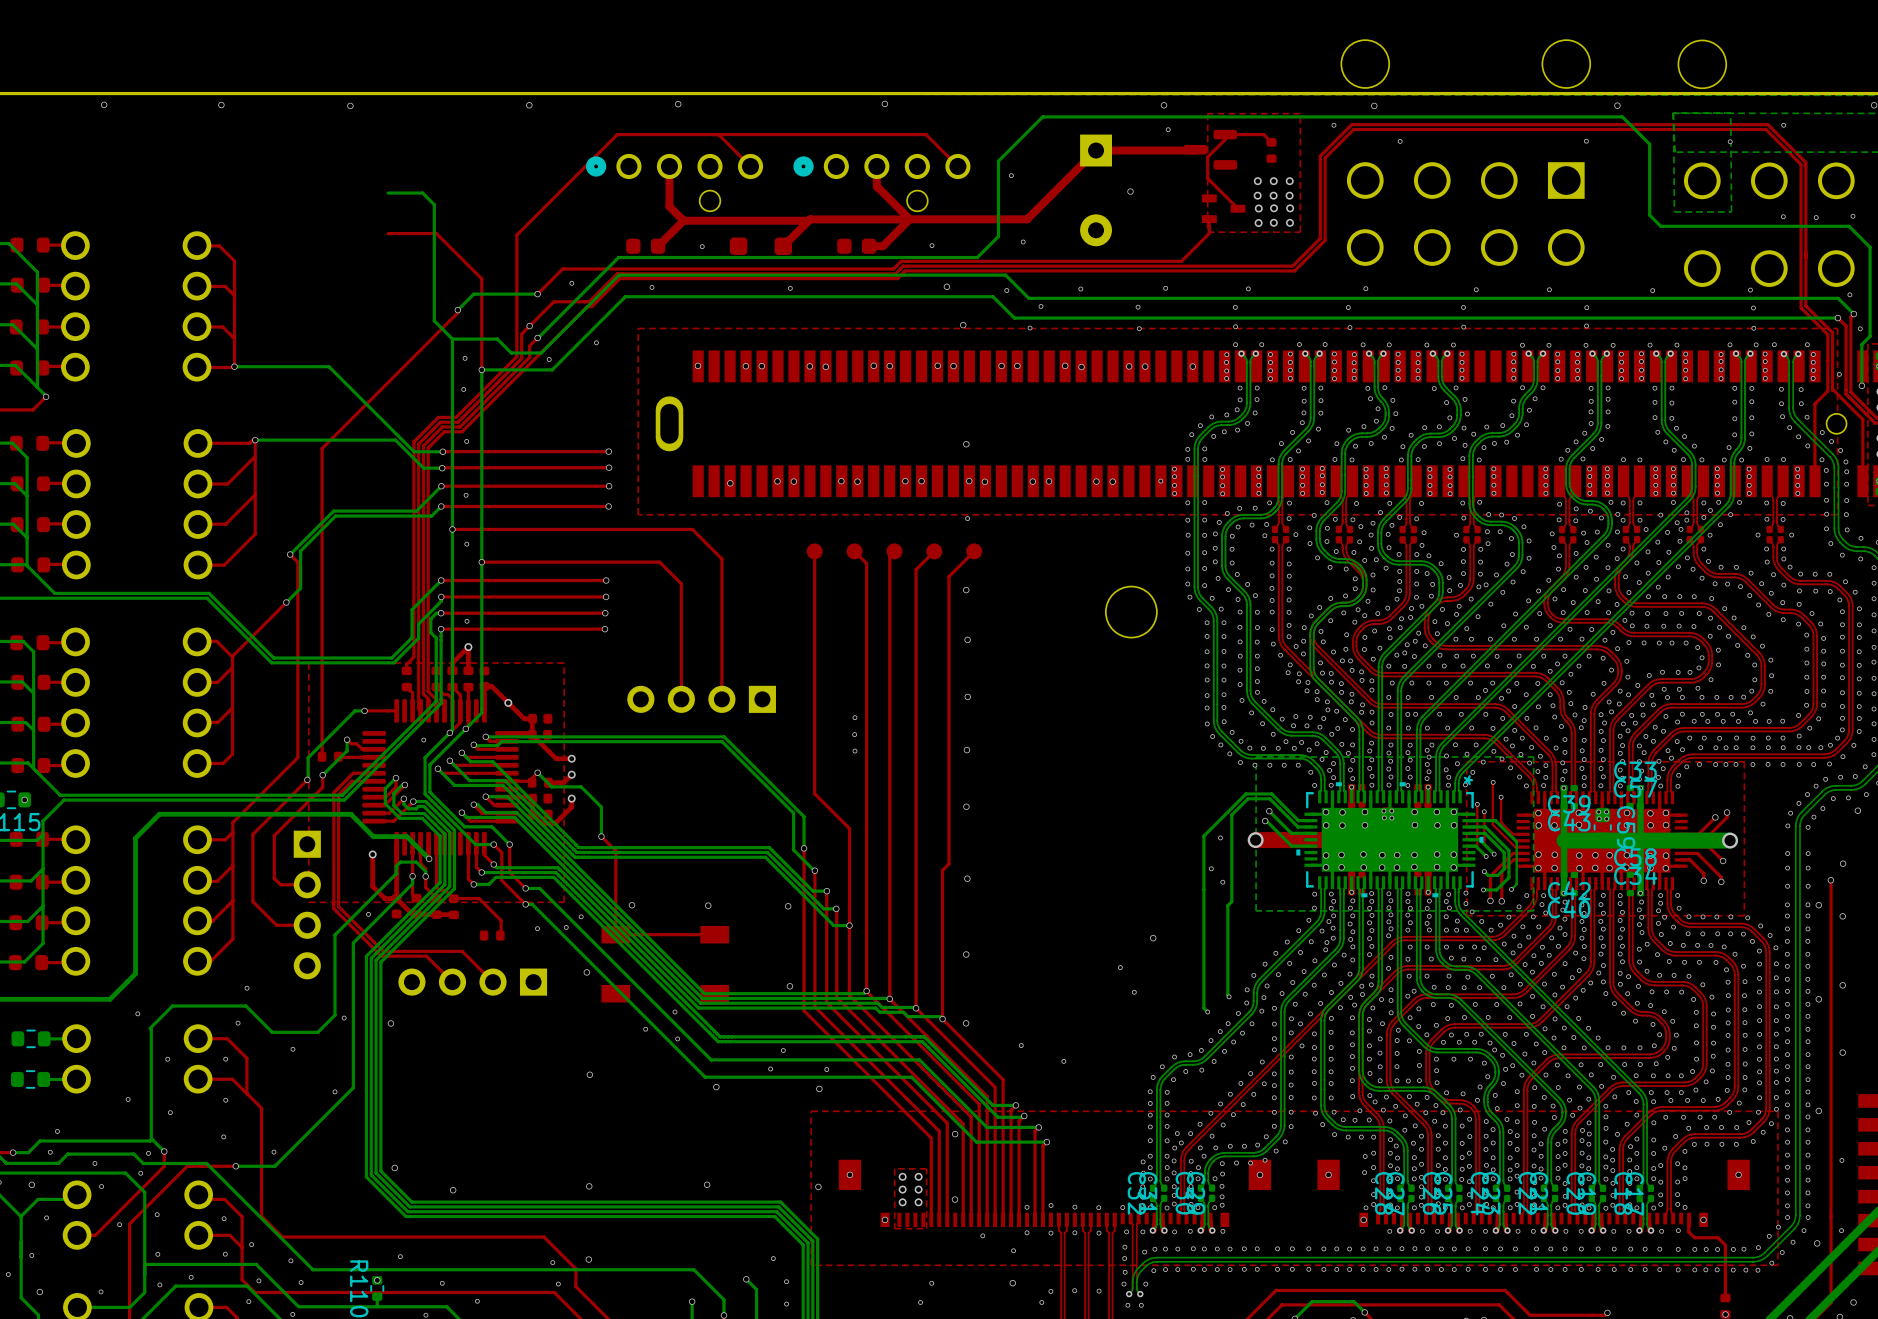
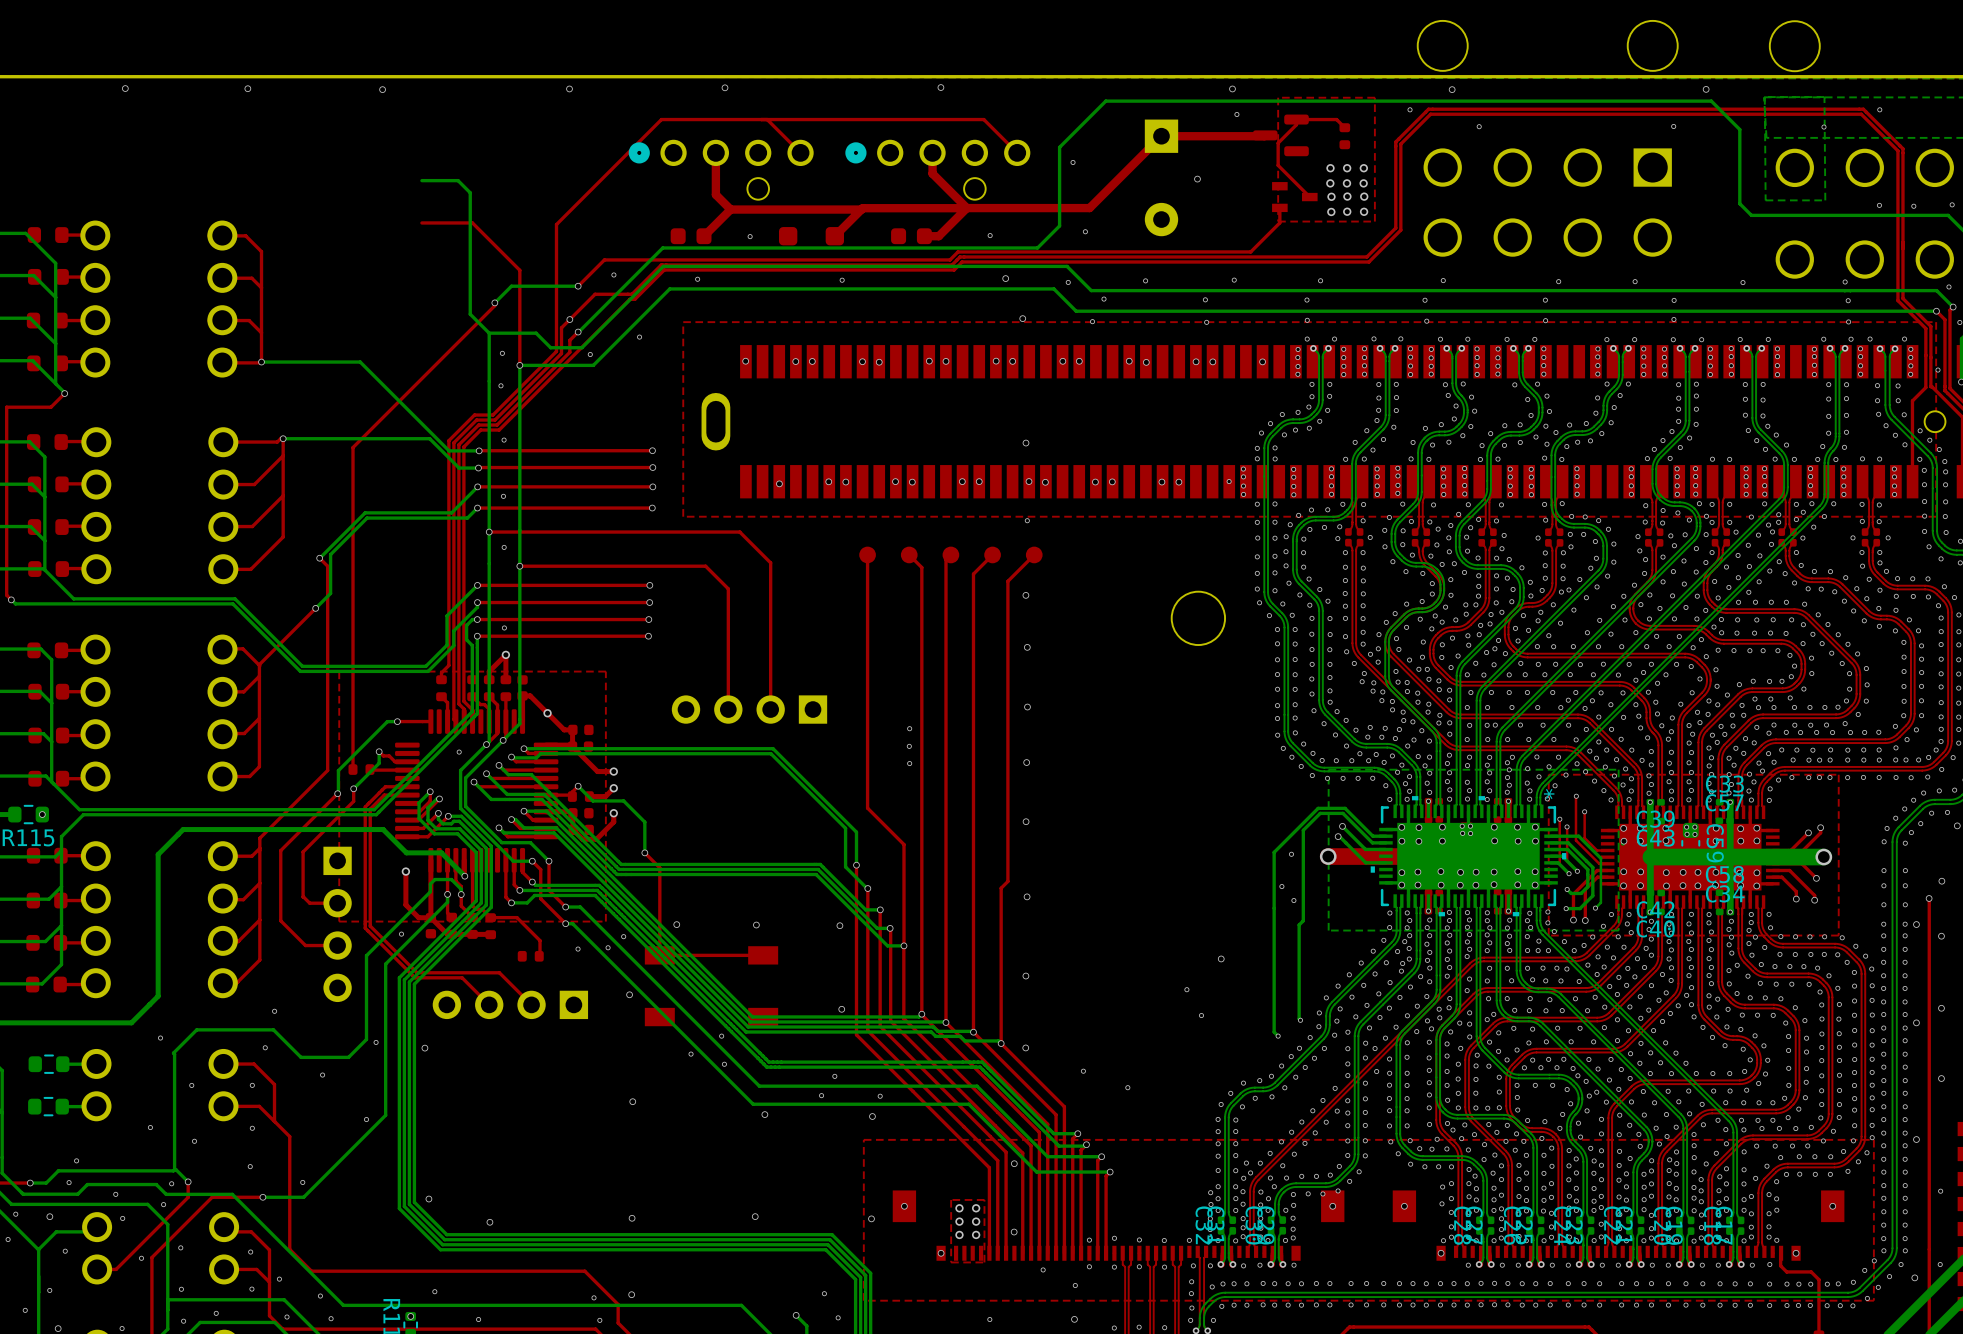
via position: (1404, 652) -> (1465, 604)
via: (1390, 761) -> none

